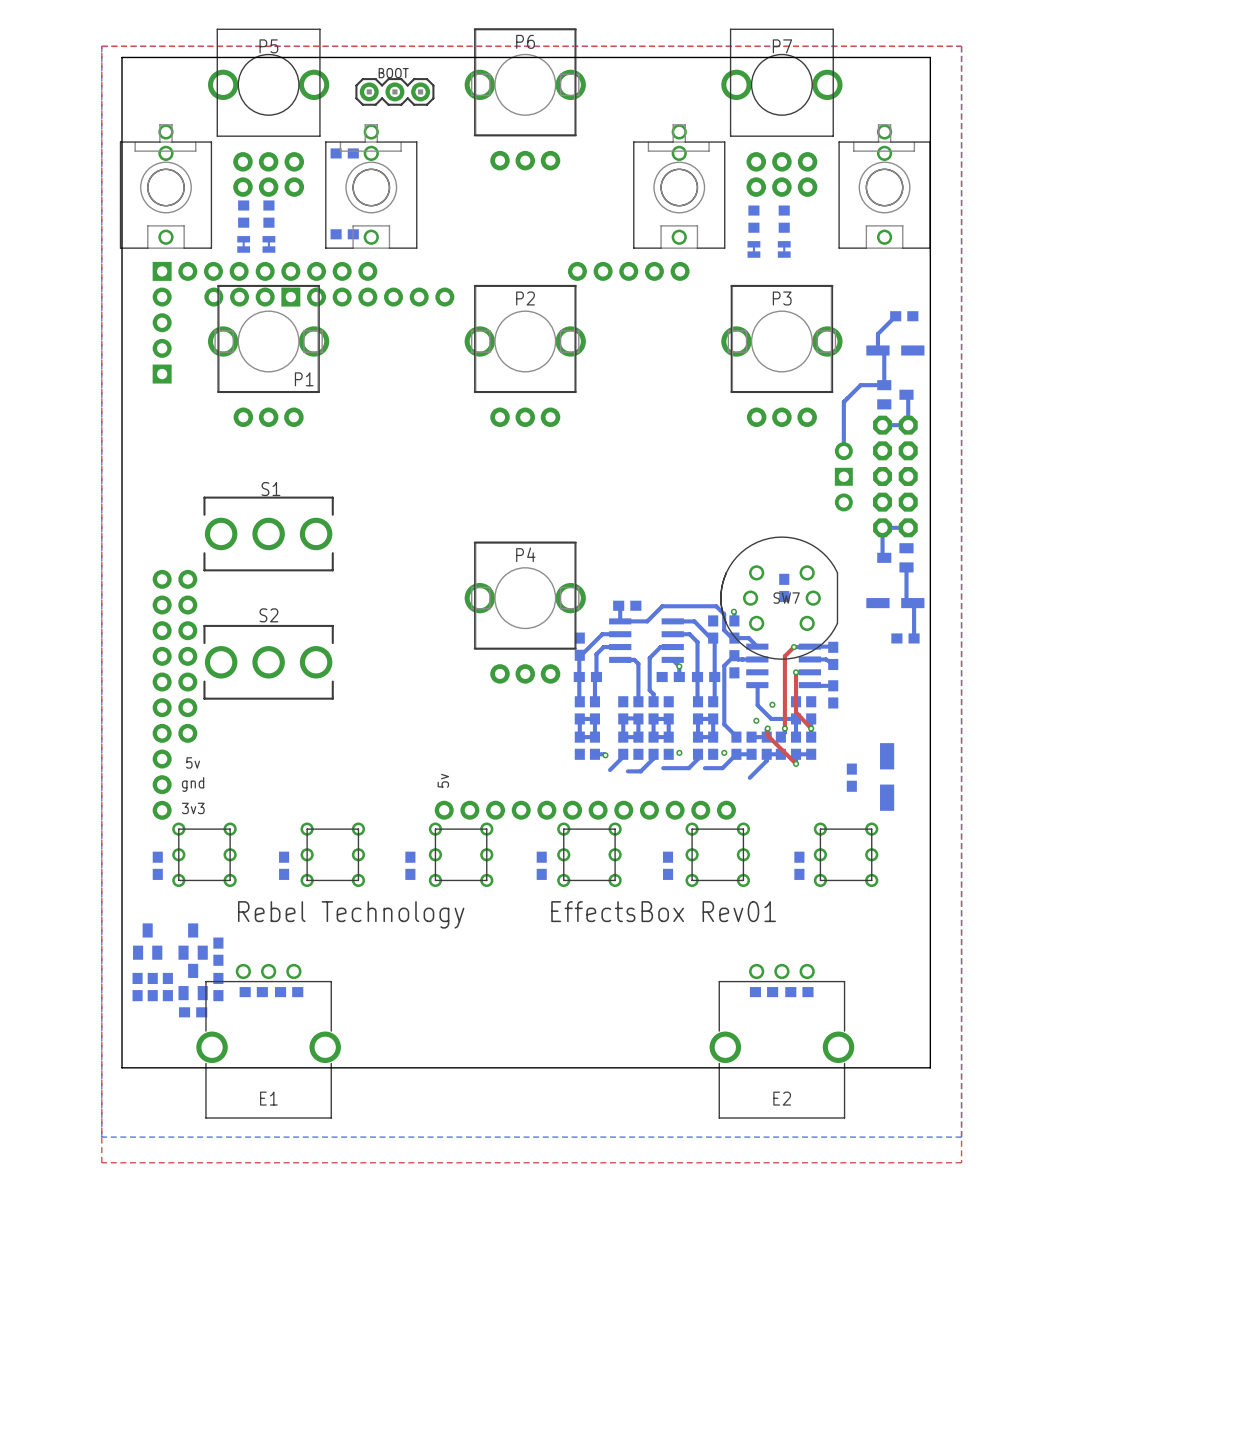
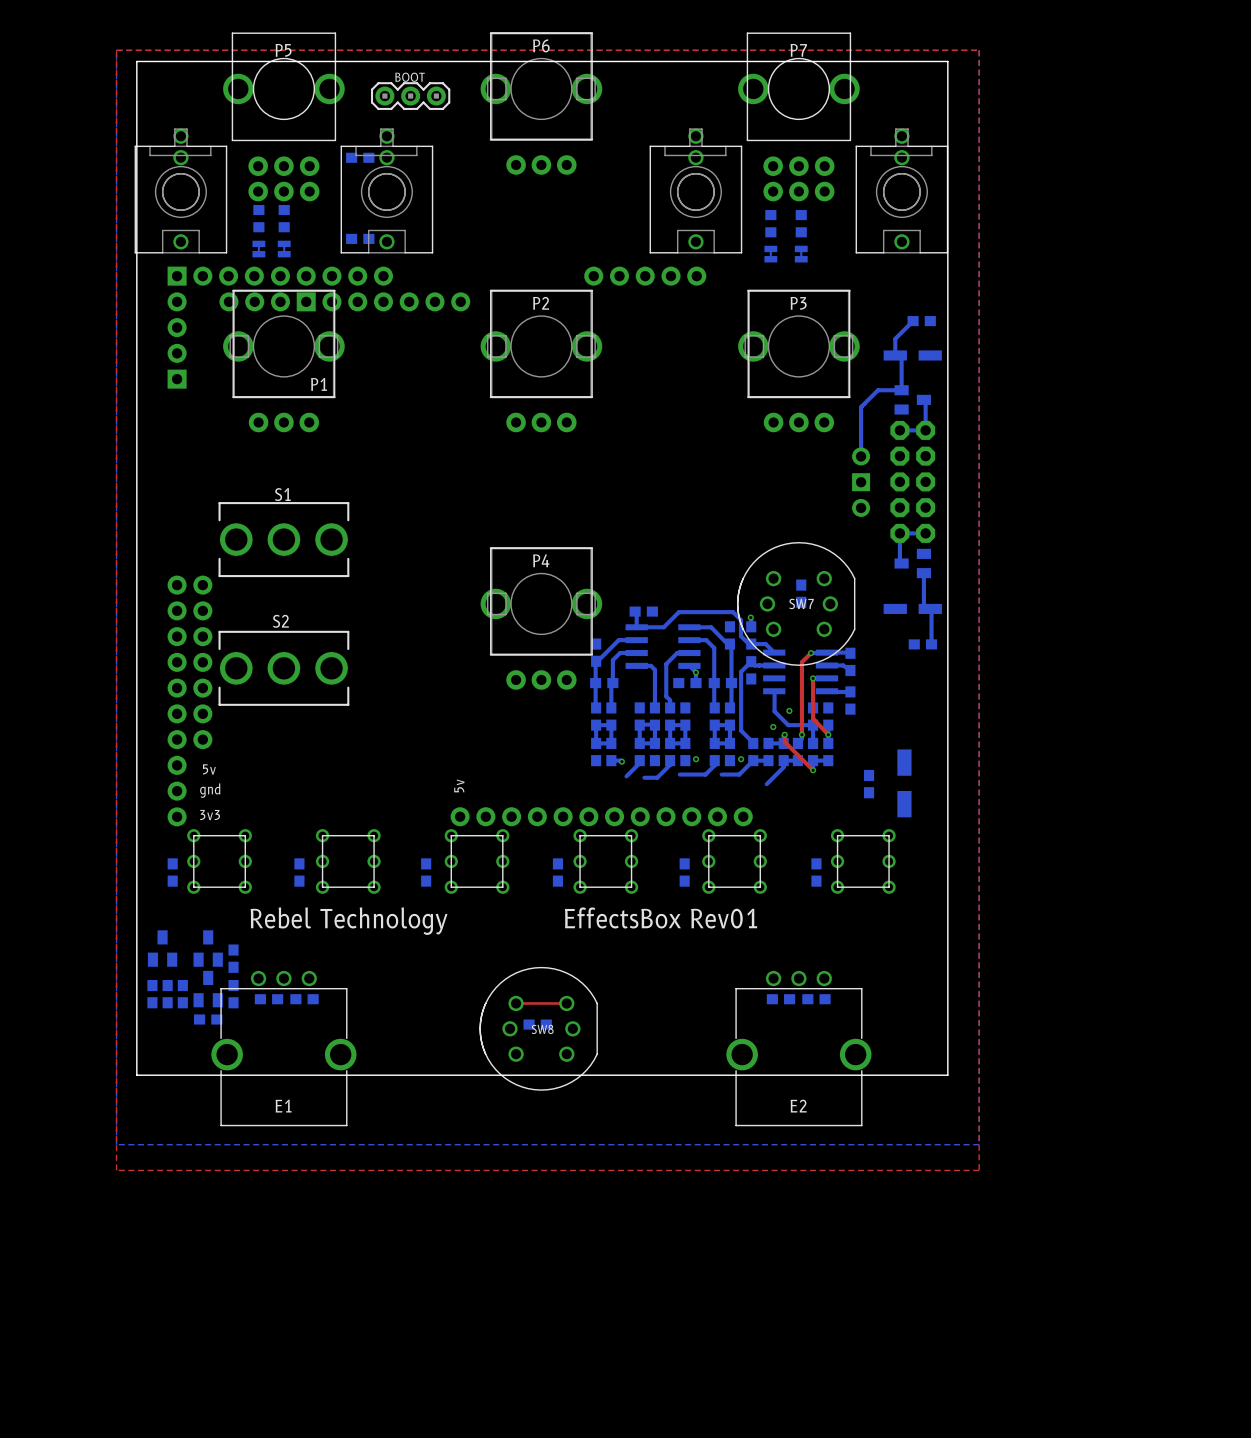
top track: none -> (516, 1003) (566, 1003)
part: none -> (537, 1024)
SW8: none -> (538, 1028)

